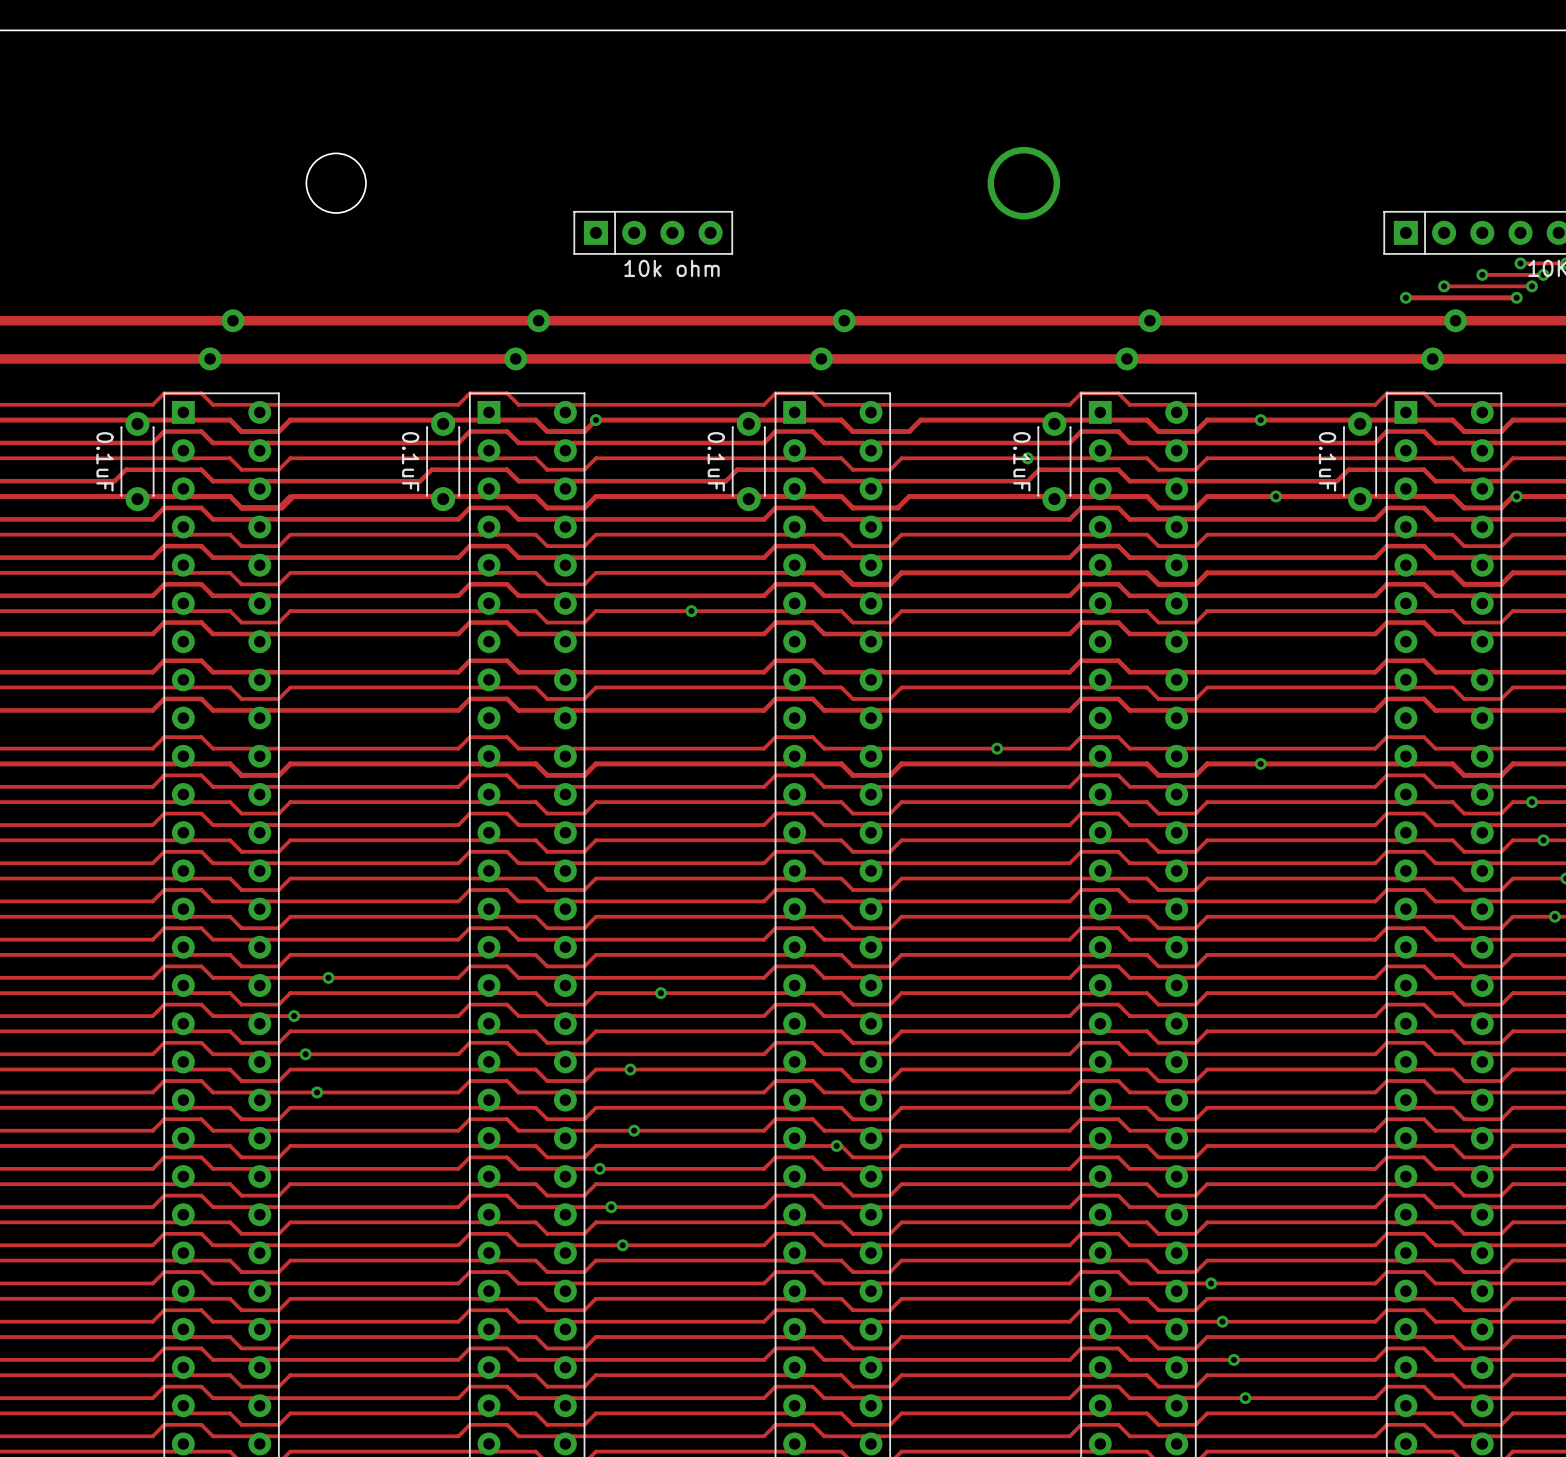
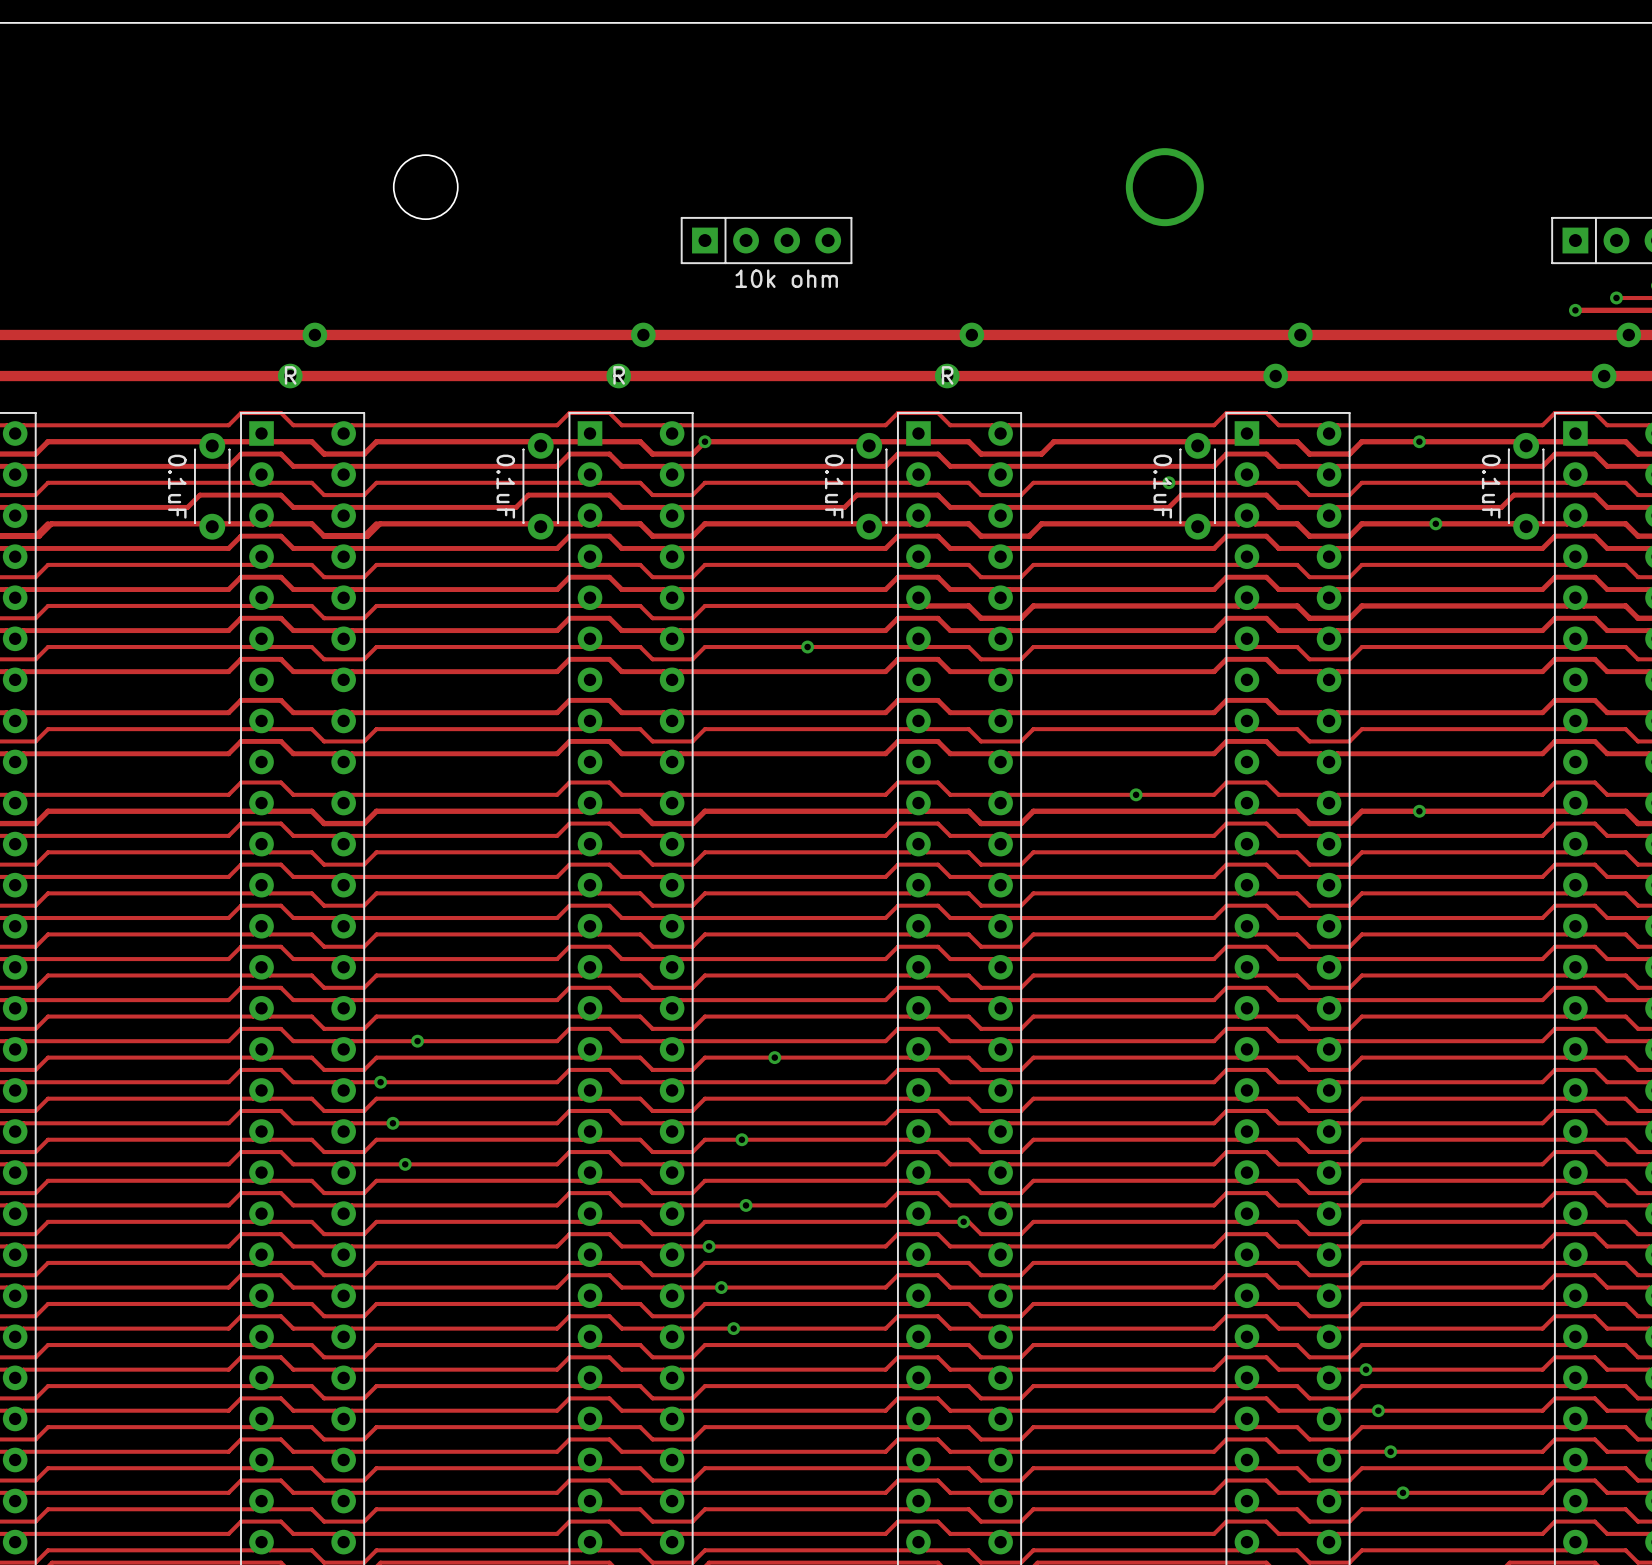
R name: none -> R (290, 375)
R name: none -> R (619, 375)
R name: none -> R (947, 375)

